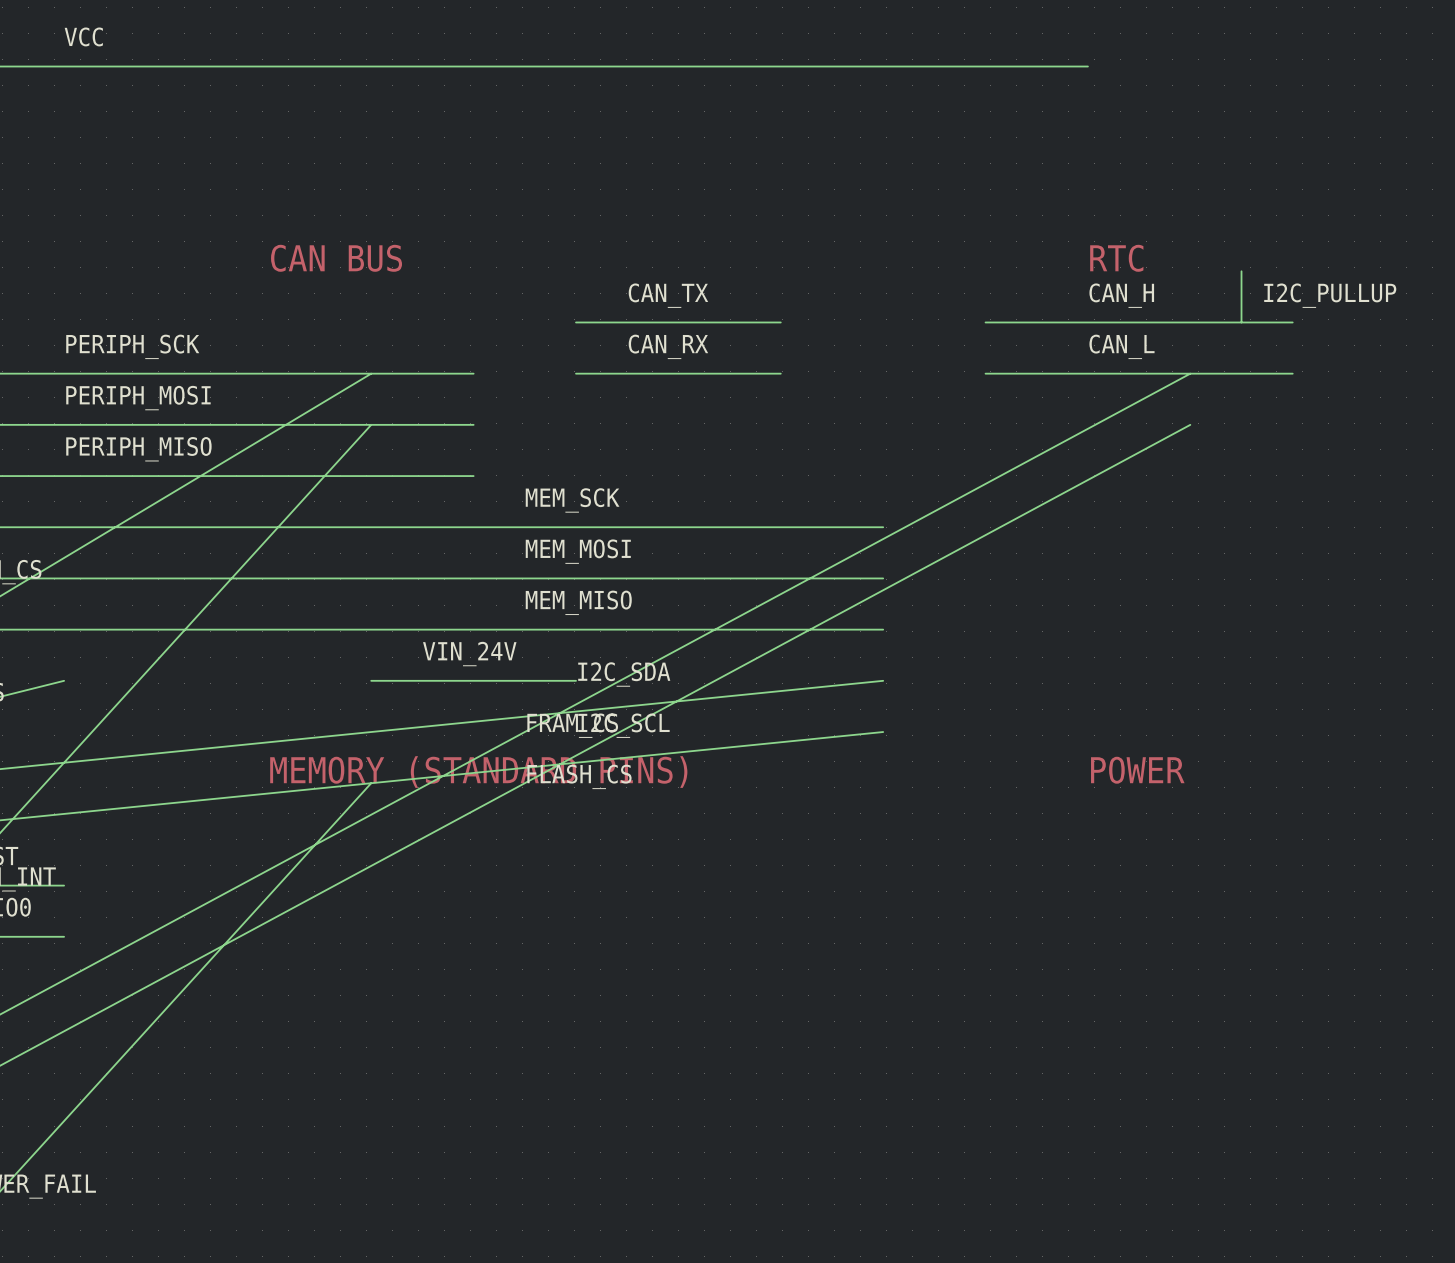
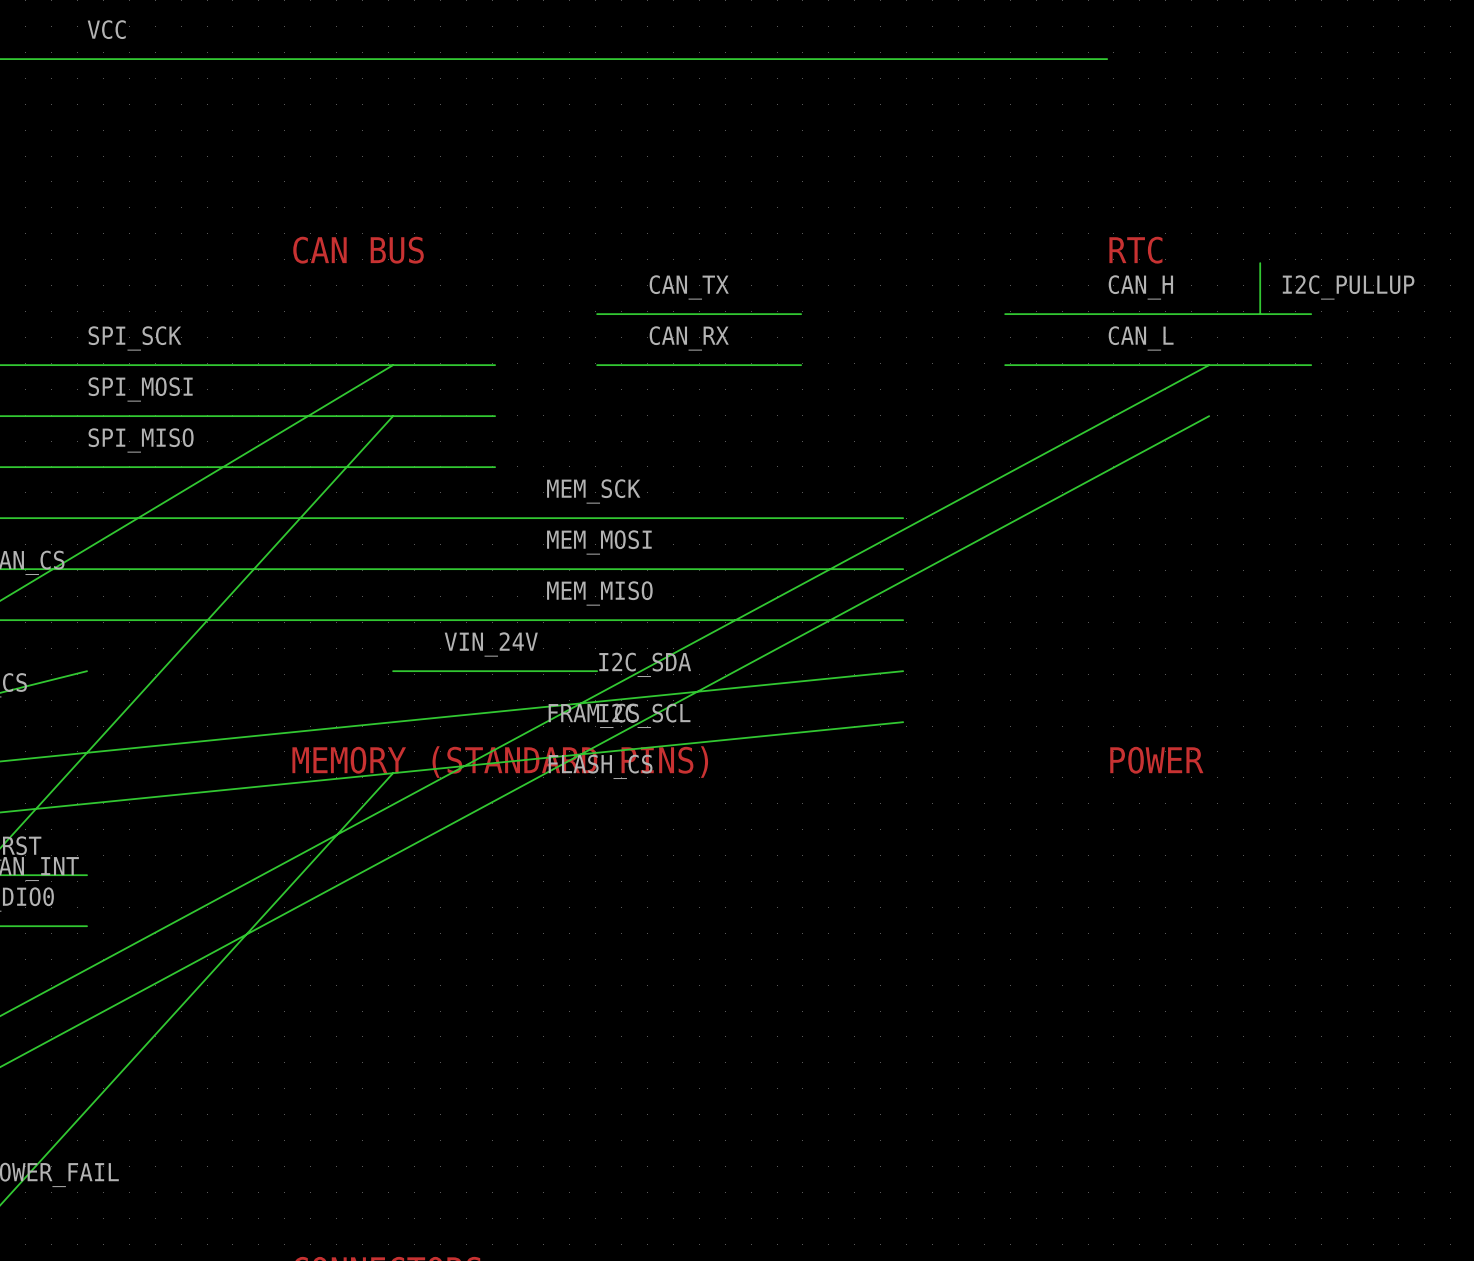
label: PERIPH_SCK (132, 346) -> SPI_SCK (134, 338)
label: PERIPH_MOSI (138, 398) -> SPI_MOSI (140, 389)
label: PERIPH_MISO (138, 449) -> SPI_MISO (141, 440)

